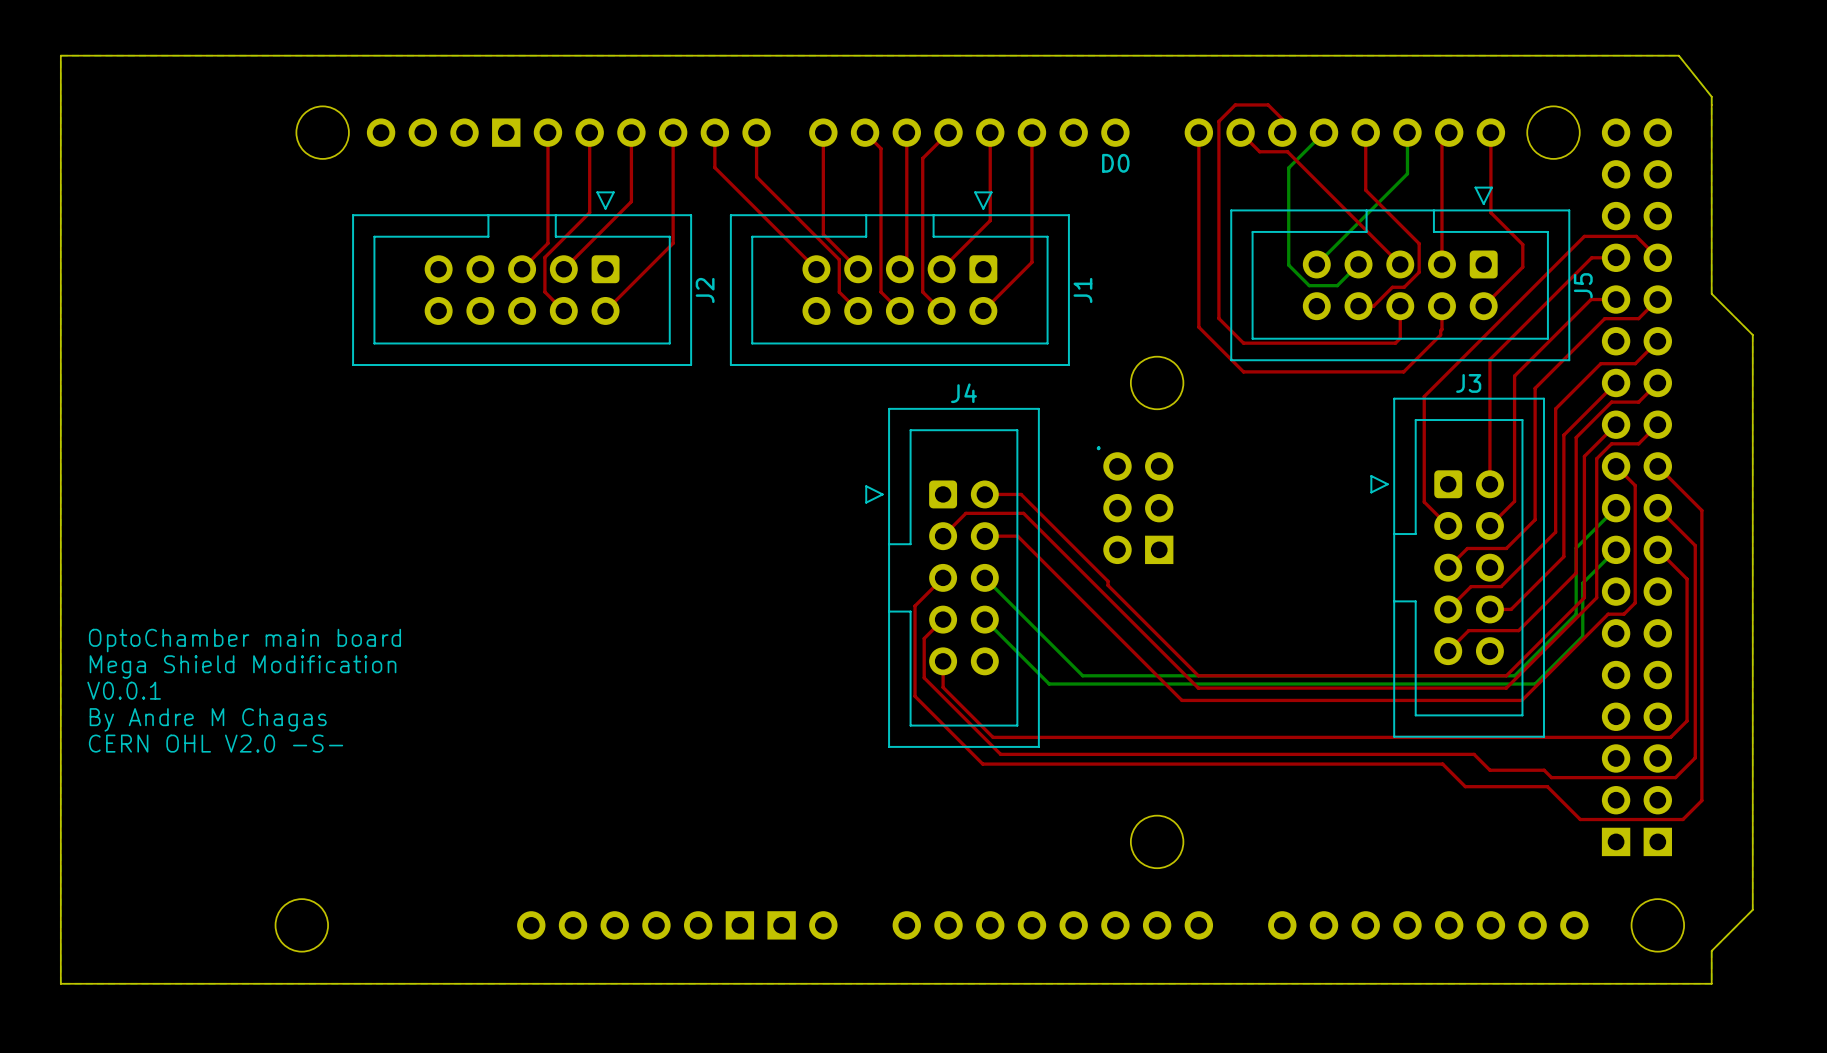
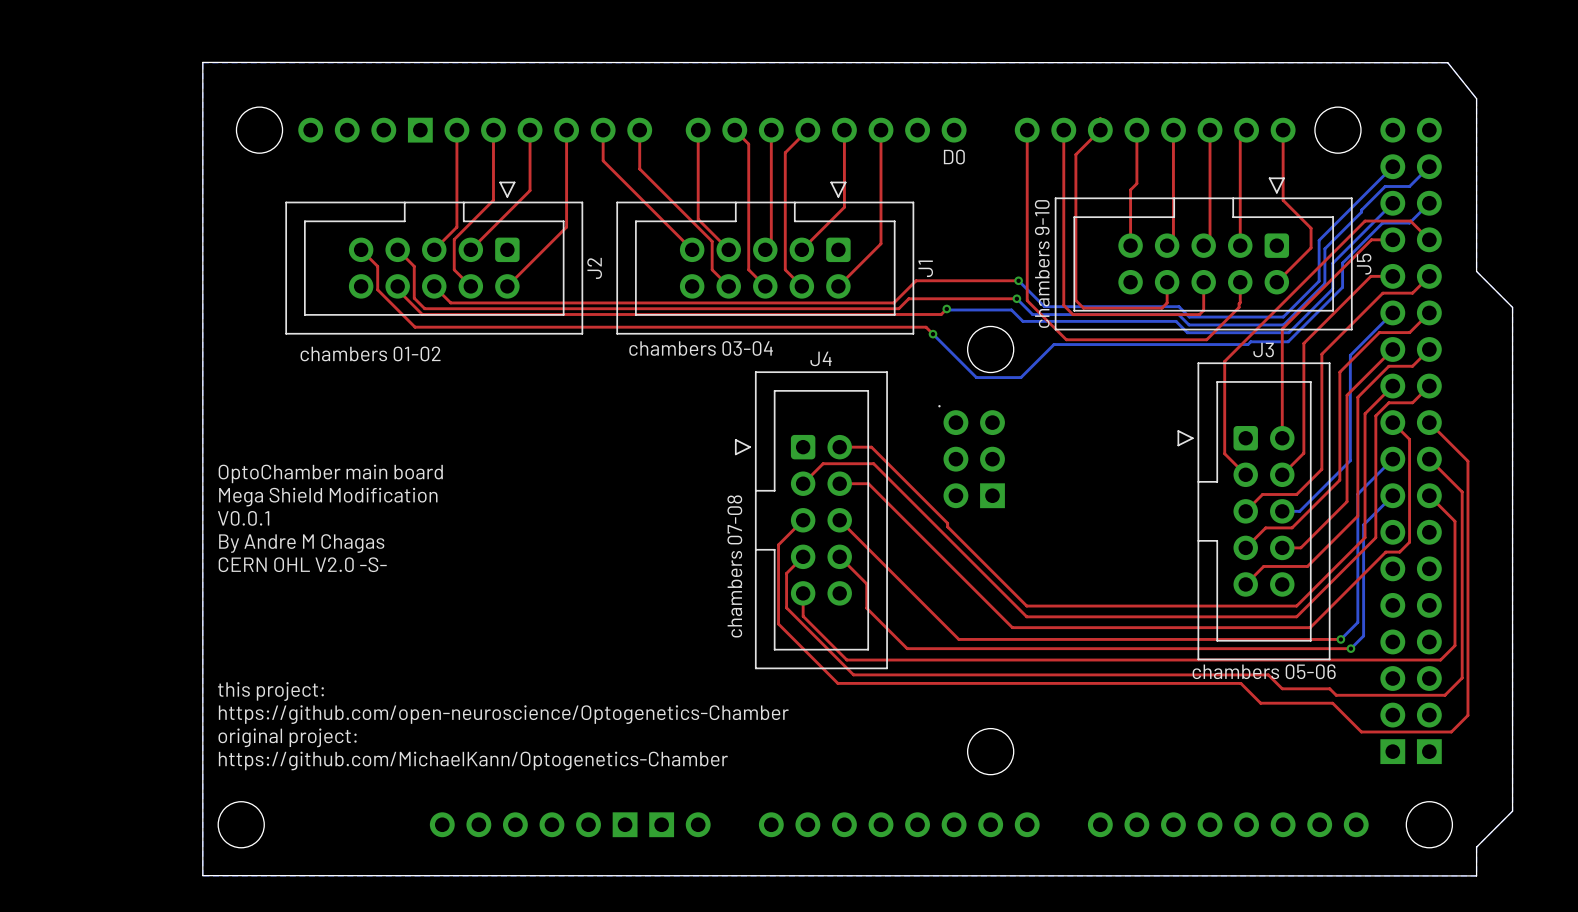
board edge: (1678, 55) (60, 55) (60, 983) (1711, 983) -> (1447, 62) (202, 62) (202, 875) (1476, 875)
top track: (1282, 119) (1268, 104) (1235, 104) (1218, 121) (1218, 318) (1243, 343) (1251, 343) -> (1063, 130) (1063, 305) (1072, 314)
top track: (1240, 132) (1259, 151) (1287, 151) (1400, 264) -> (1210, 130) (1210, 239) (1203, 245)
top track: none -> (1100, 130) (1075, 154) (1075, 300) (1083, 308) (1161, 308) (1167, 302) (1167, 282)
top track: none -> (1136, 130) (1136, 183) (1130, 189) (1130, 245)
bottom track: (1324, 132) (1288, 167) (1288, 265) (1309, 285) (1337, 285) (1358, 264) -> none
bottom track: (1407, 132) (1407, 173) (1316, 264) -> none
bottom track: none -> (1392, 166) (1319, 240) (1319, 281) (1283, 317) (1189, 317) (1178, 306) (1044, 306) (1018, 280)
bottom track: none -> (1429, 166) (1409, 186) (1385, 186) (1324, 248) (1324, 283) (1283, 324) (1189, 324) (1178, 314) (1032, 314) (1016, 298)
top track: (1365, 190) (1419, 243) (1419, 272) (1404, 287) (1392, 287) (1373, 306) (1358, 306) -> (1173, 180) (1173, 239) (1167, 245)
bottom track: none -> (1392, 203) (1332, 263) (1332, 288) (1289, 332) (1187, 332) (1176, 321) (1022, 321) (1011, 309) (946, 308)
bottom track: none -> (1429, 203) (1409, 223) (1382, 223) (1342, 263) (1342, 287) (1288, 341) (1250, 341) (1248, 344) (1054, 344) (1020, 377) (976, 377) (933, 334)
top track: none -> (361, 249) (377, 266) (377, 289) (415, 327) (926, 327) (933, 334)
top track: none -> (397, 249) (414, 266) (414, 298) (424, 308) (898, 308) (908, 298) (1016, 298)
J5 value: none -> chambers 9-10 (1042, 264)
top track: none -> (1018, 280) (916, 280) (893, 302) (450, 302) (434, 286)
via: none -> (1018, 280)
top track: none -> (397, 286) (397, 289) (422, 314) (941, 314) (946, 308)
via: none -> (1016, 298)
via: none -> (946, 308)
bottom track: none -> (1392, 312) (1350, 355) (1350, 460) (1299, 511) (1282, 511)
via: none -> (933, 334)
J1 value: none -> chambers 03-04 (701, 348)
J2 value: none -> chambers 01-02 (370, 353)
top track: none -> (839, 520) (958, 639) (1340, 639)
bottom track: (984, 577) (1082, 675) (1514, 675) (1576, 614) -> (1340, 639) (1357, 622) (1357, 552)
top track: none -> (839, 556) (866, 583) (866, 608) (907, 648) (1350, 648)
bottom track: (984, 619) (1049, 684) (1535, 684) (1582, 636) -> (1350, 648) (1363, 635) (1363, 571)
J4 value: none -> chambers 07-08 (734, 566)
text position: OptoChamber main board (244, 640) -> OptoChamber main board (330, 473)
text position: Mega Shield Modification (243, 666) -> Mega Shield Modification (328, 497)
text position: V0.0.1 (124, 690) -> V0.0.1 (243, 518)
via: none -> (1340, 639)
text position: By Andre M Chagas (208, 719) -> By Andre M Chagas (301, 543)
via: none -> (1350, 648)
text position: CERN OHL V2.0 -S- (216, 743) -> CERN OHL V2.0 -S- (302, 564)
J3 value: none -> chambers 05-06 (1264, 671)
text: none -> this project: (270, 691)
text: none -> https://github.com/open-neuroscience/Optogenetics-Chamber (503, 714)
text: none -> original project: (287, 737)
text: none -> https://github.com/MichaelKann/Optogenetics-Chamber (473, 760)

